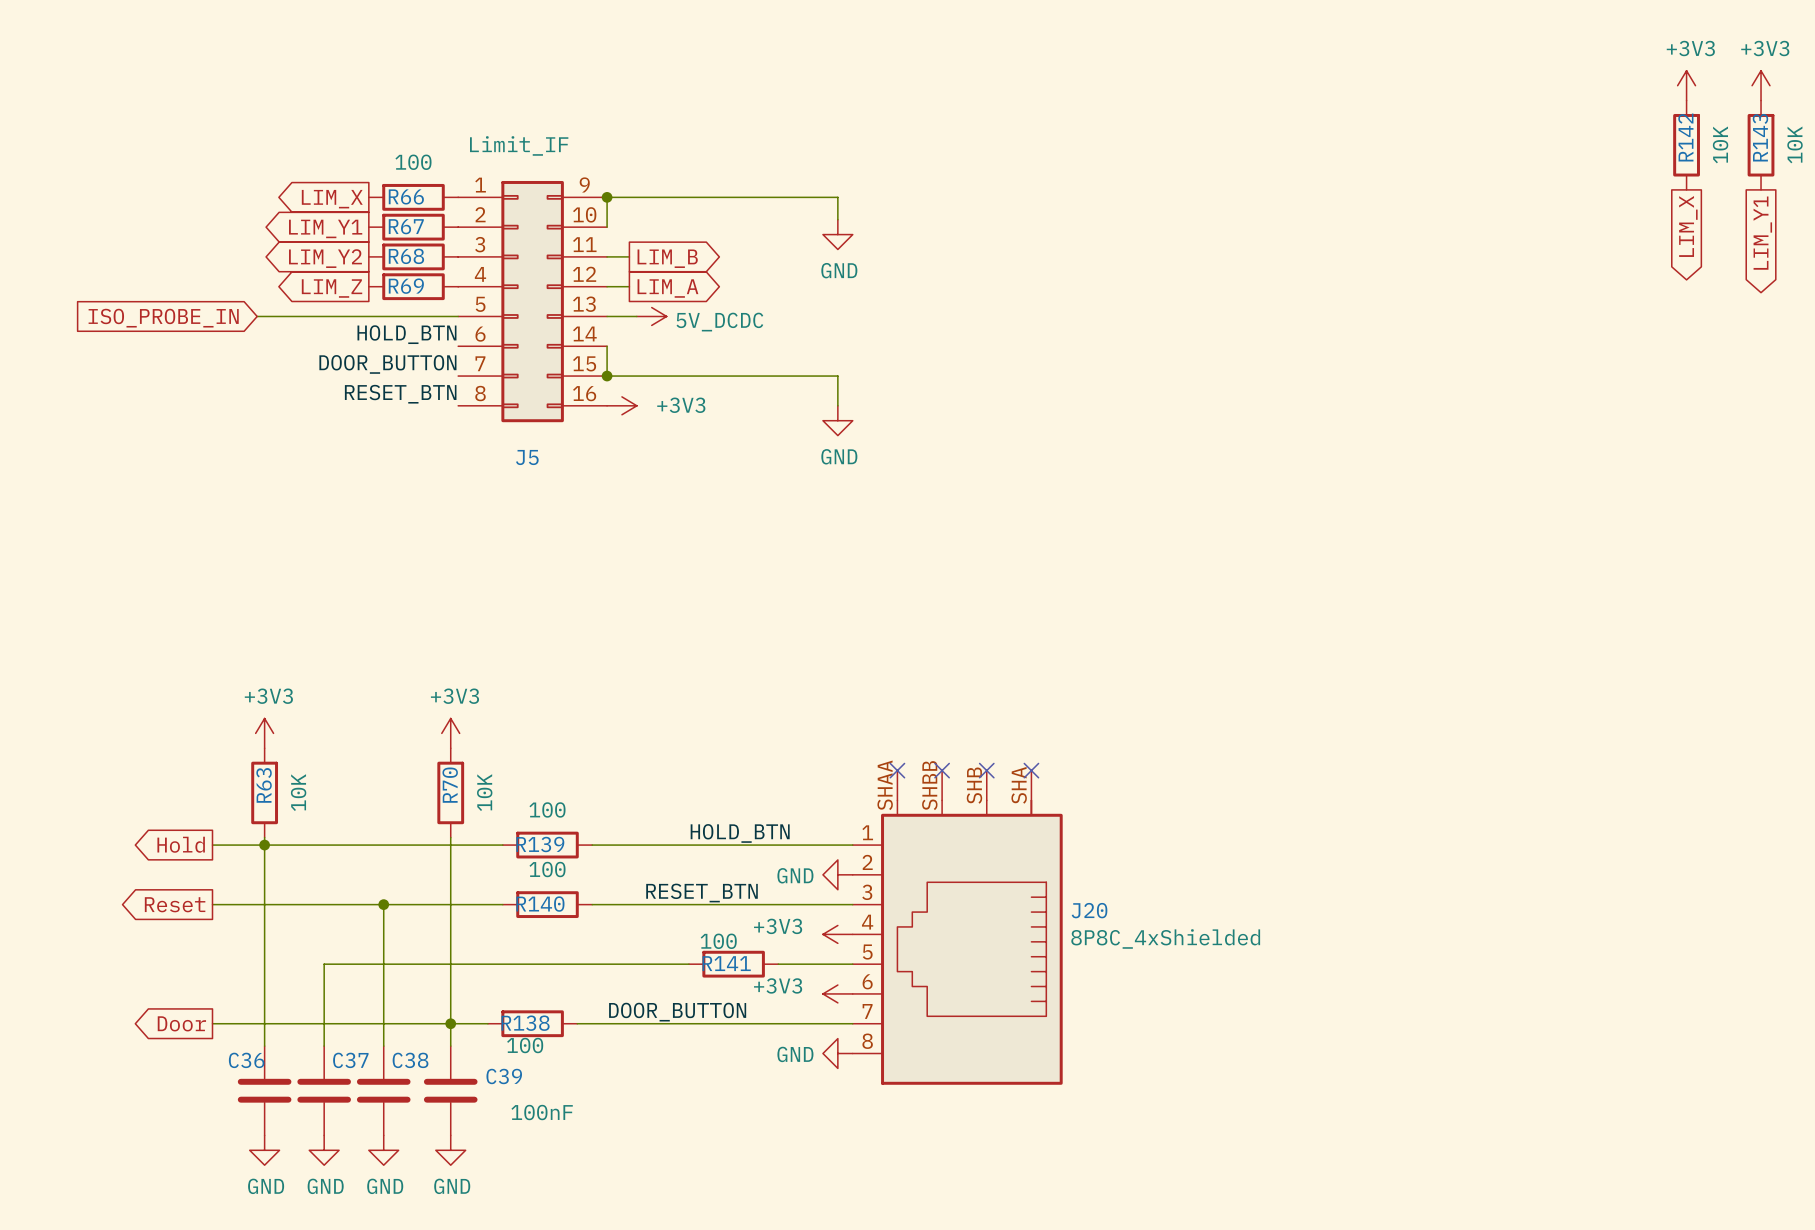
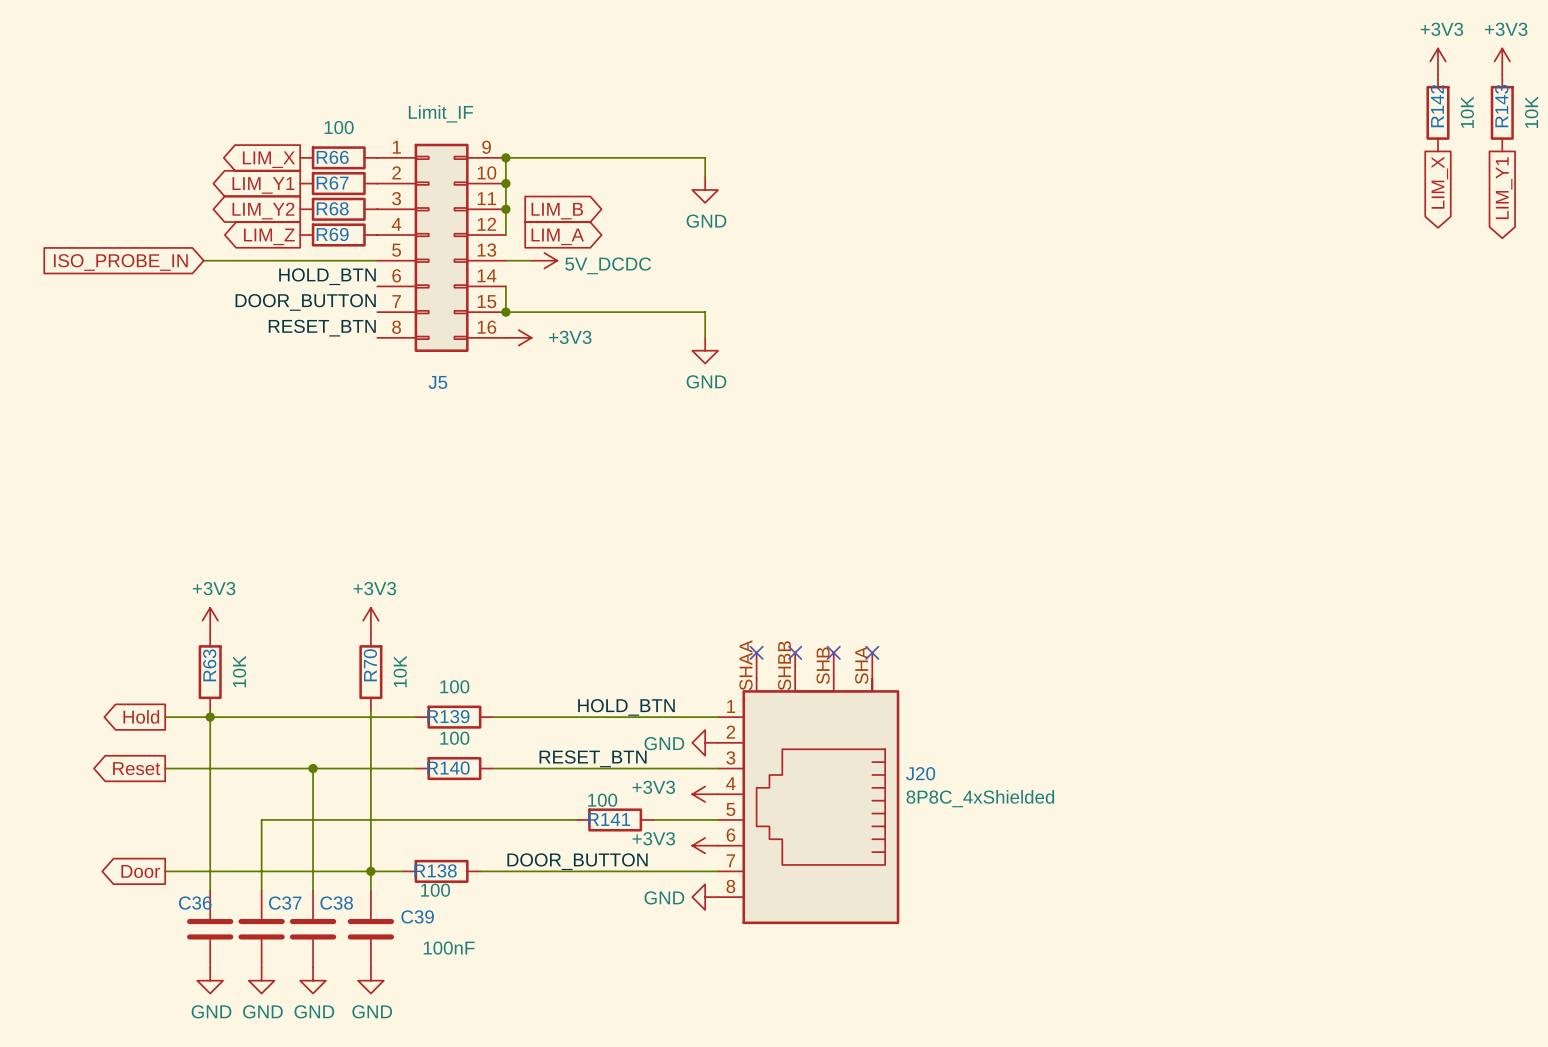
junction: none -> (505, 183)
wire: (607, 256) (629, 256) -> none
junction: none -> (505, 209)
wire: (607, 286) (629, 286) -> (505, 235) (505, 183)

